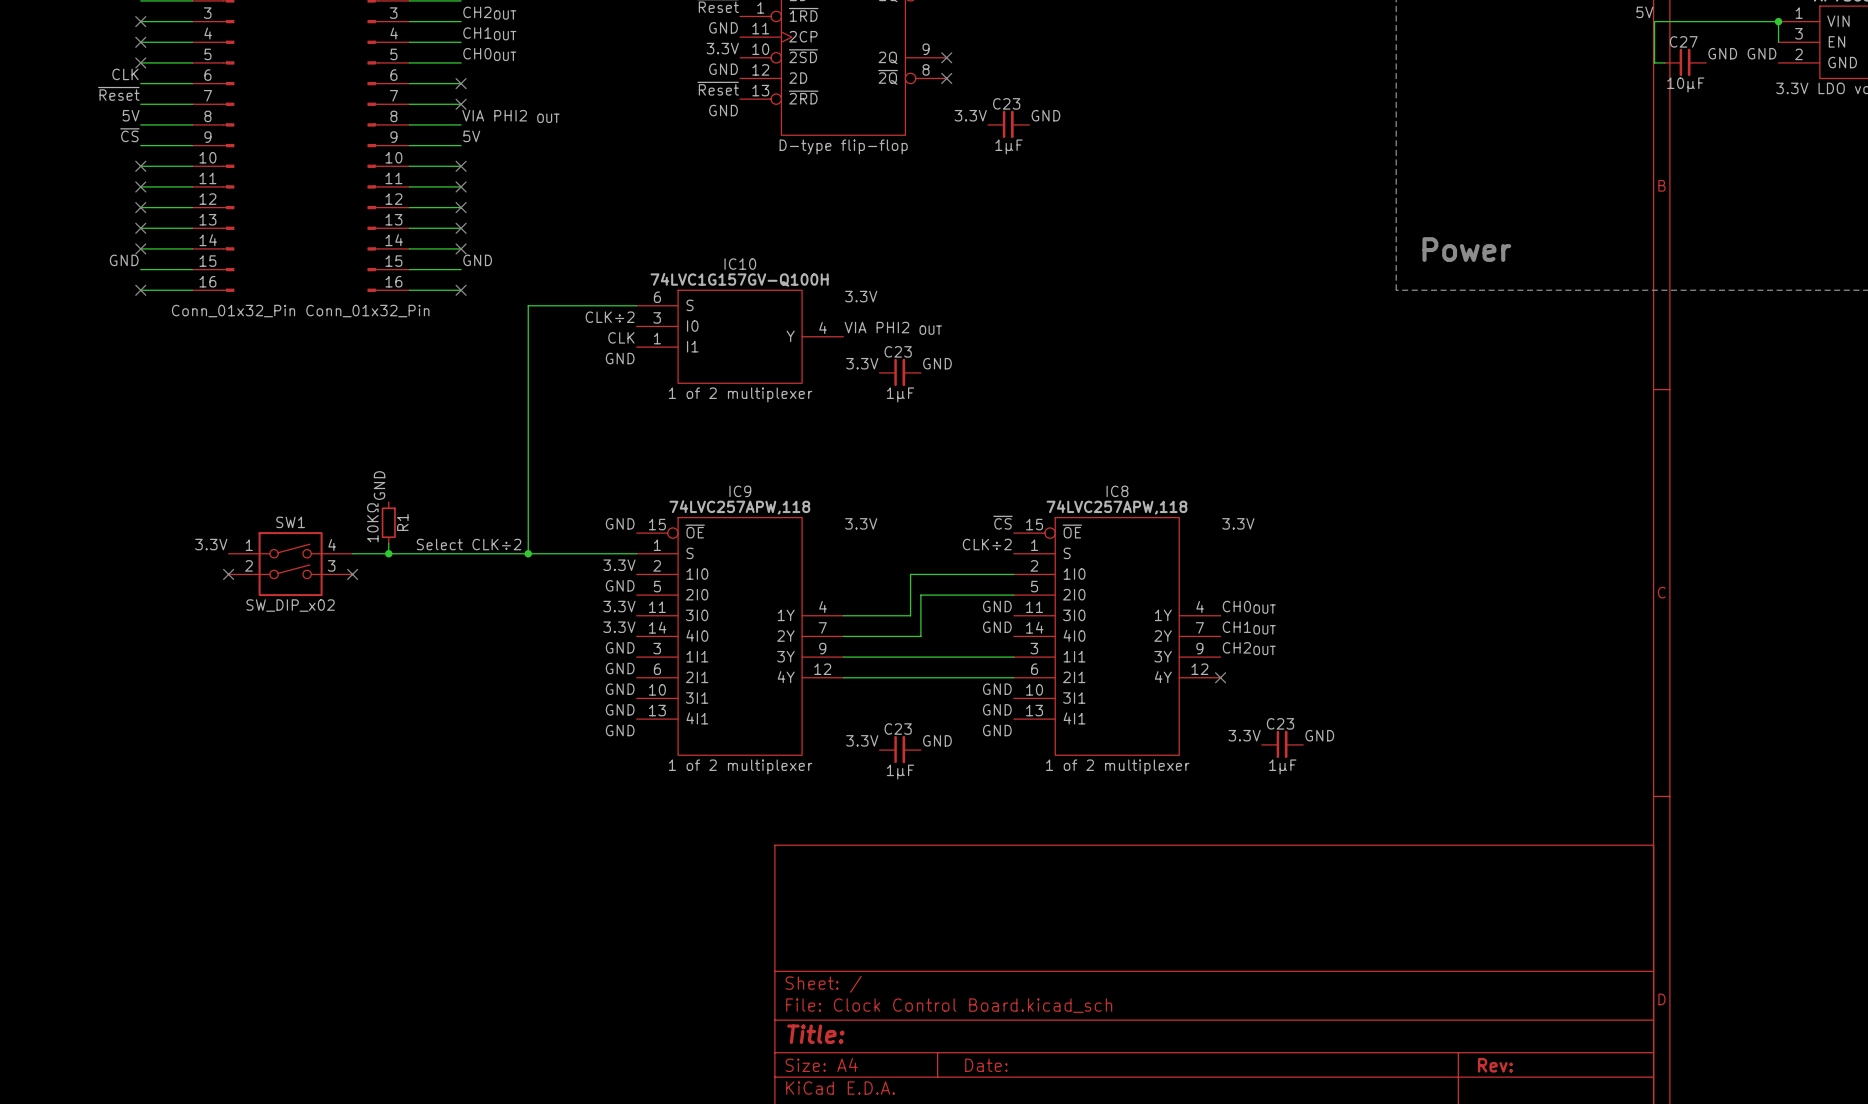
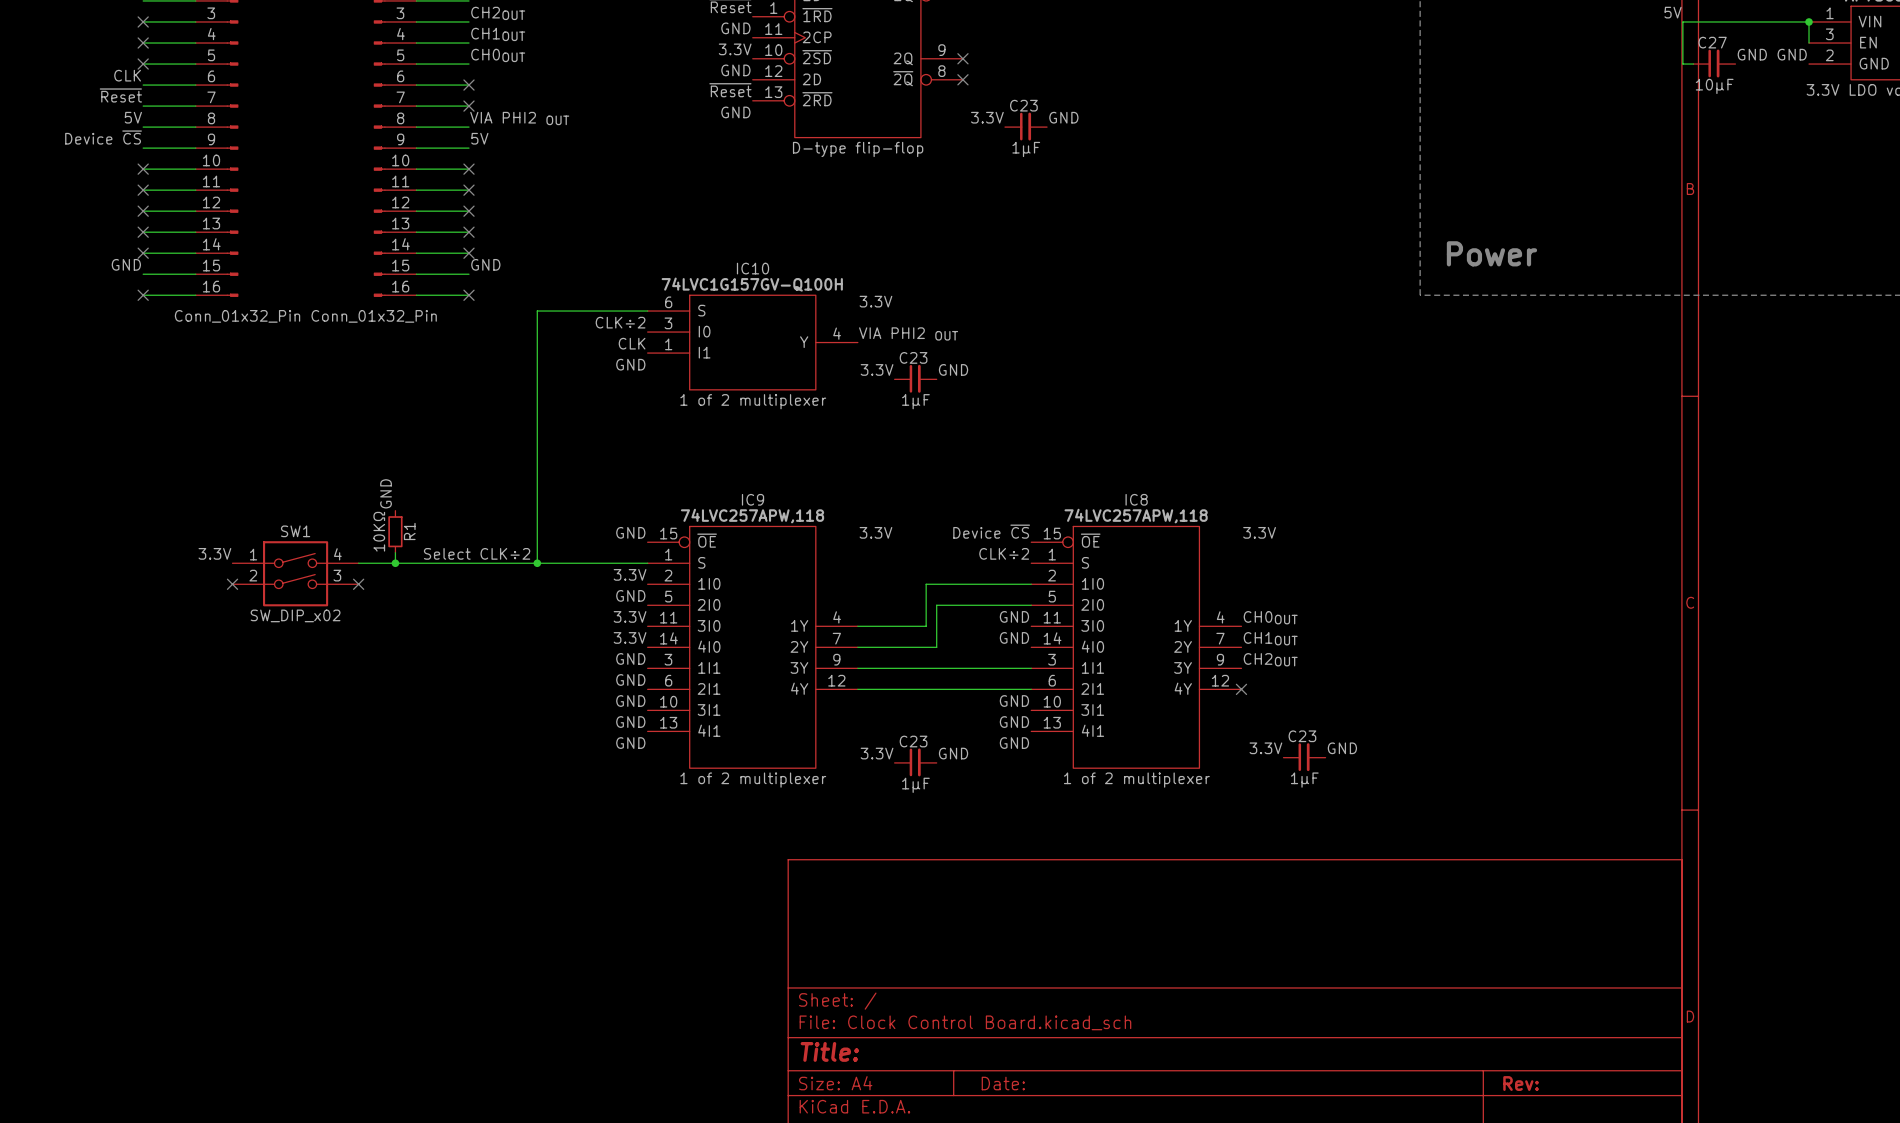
label: ~{CS} (129, 135) -> Device ~{CS} (103, 137)
label: ~{CS} (1002, 522) -> Device ~{CS} (991, 531)

